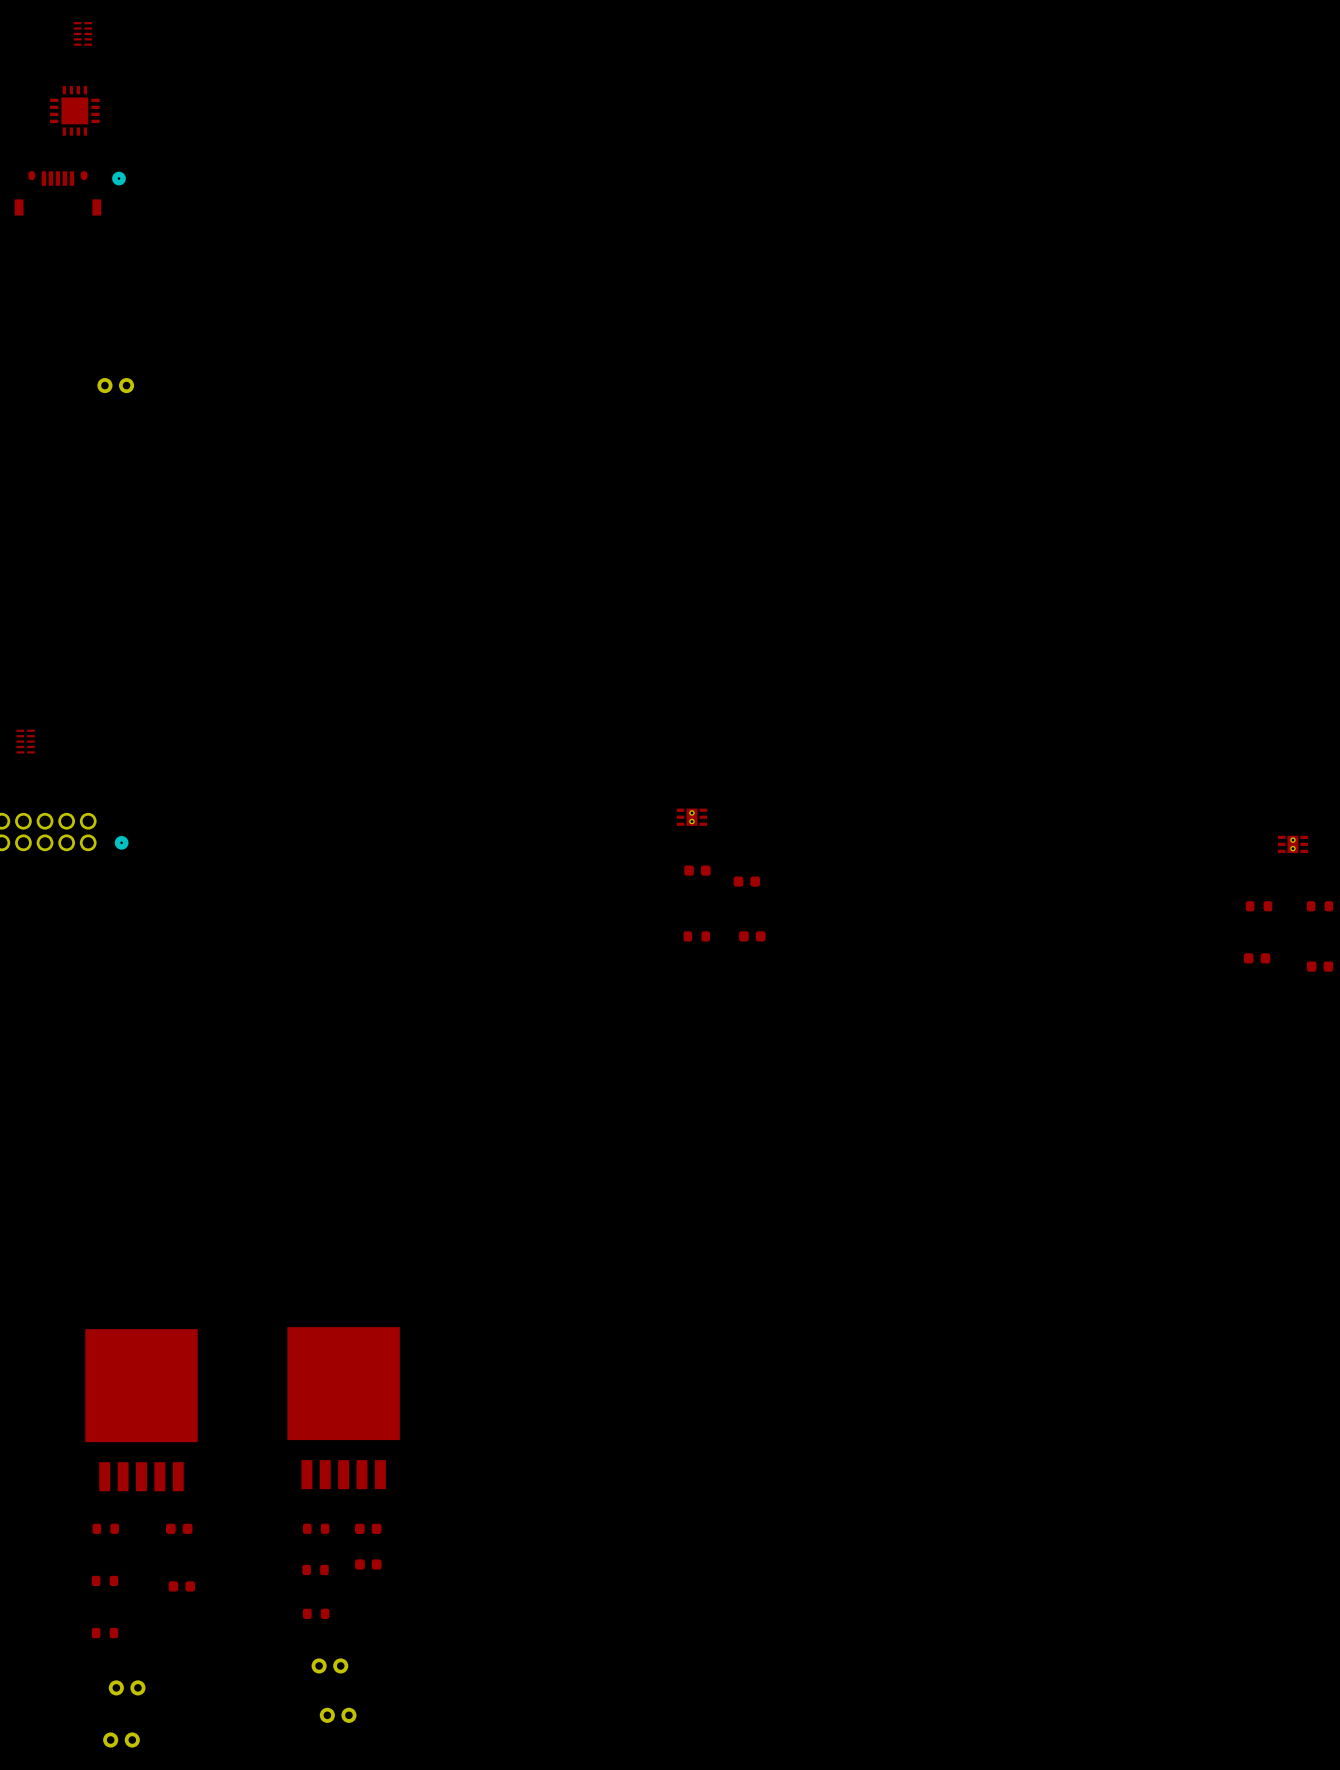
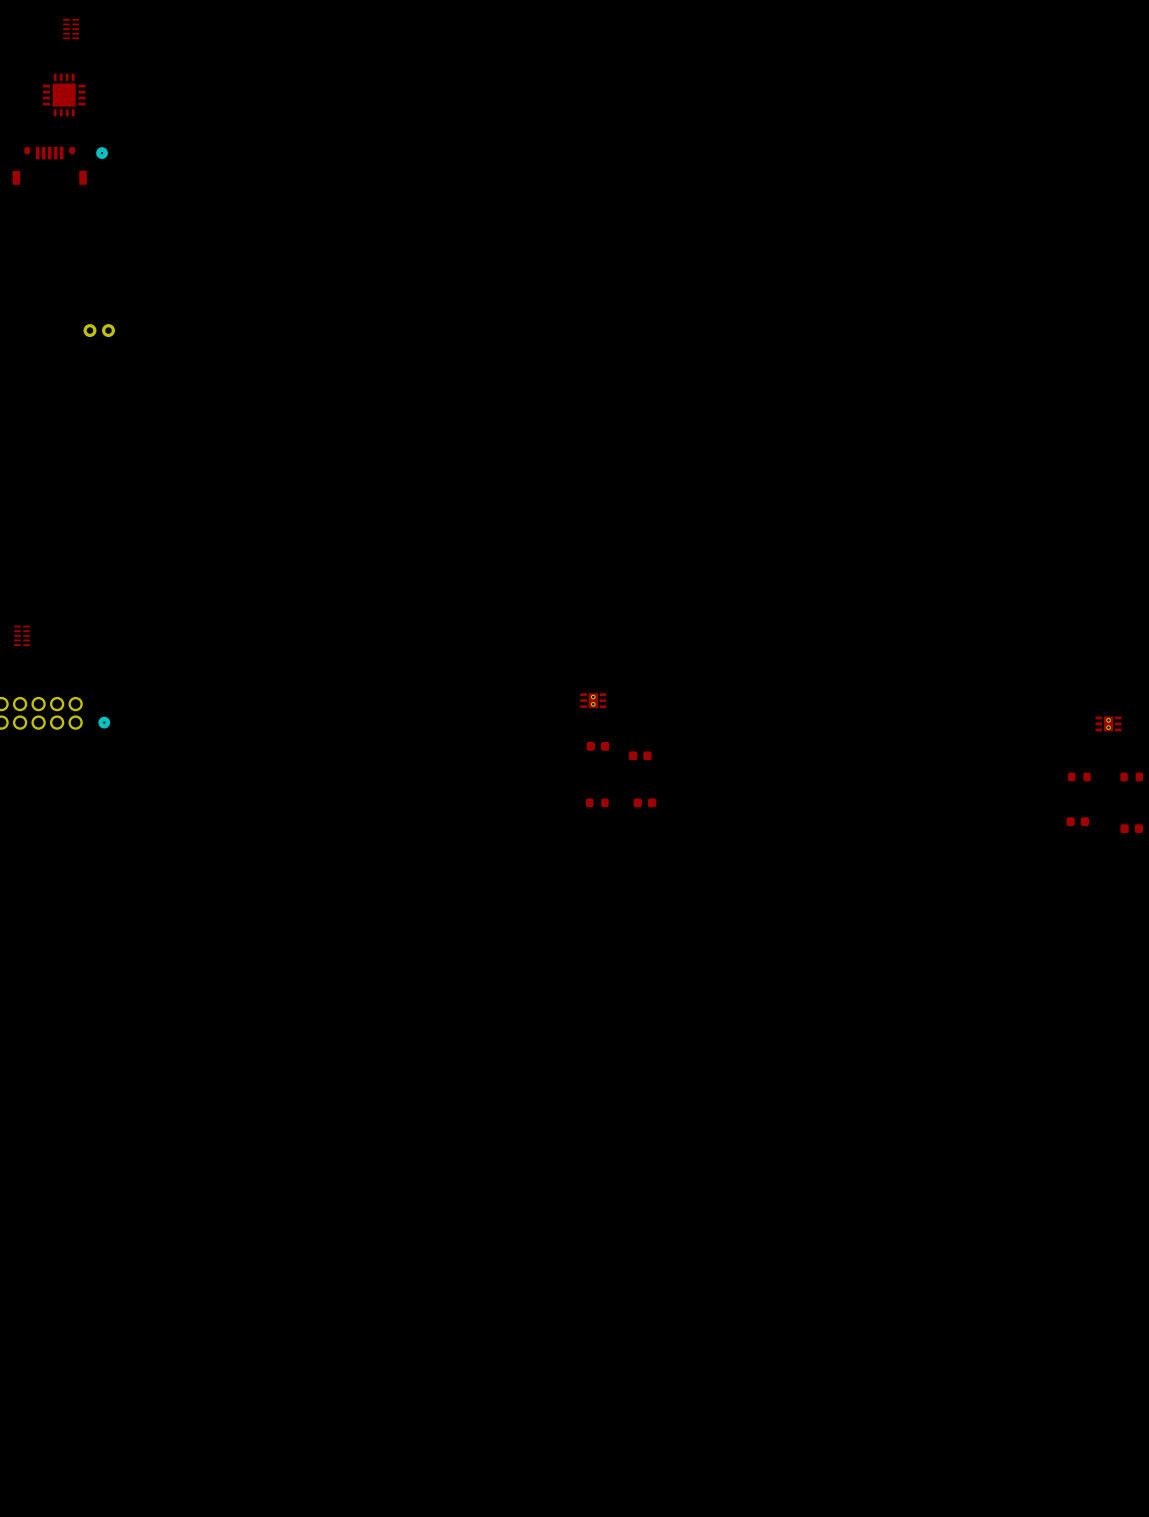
part: (343, 1408) -> none
part: (141, 1410) -> none
part: (105, 1528) -> none
part: (179, 1528) -> none
part: (316, 1528) -> none
part: (368, 1528) -> none
part: (368, 1564) -> none
part: (315, 1569) -> none
part: (105, 1580) -> none
part: (181, 1586) -> none
part: (316, 1613) -> none
part: (105, 1633) -> none
part: (329, 1665) -> none
part: (127, 1687) -> none
part: (338, 1715) -> none
part: (121, 1740) -> none

